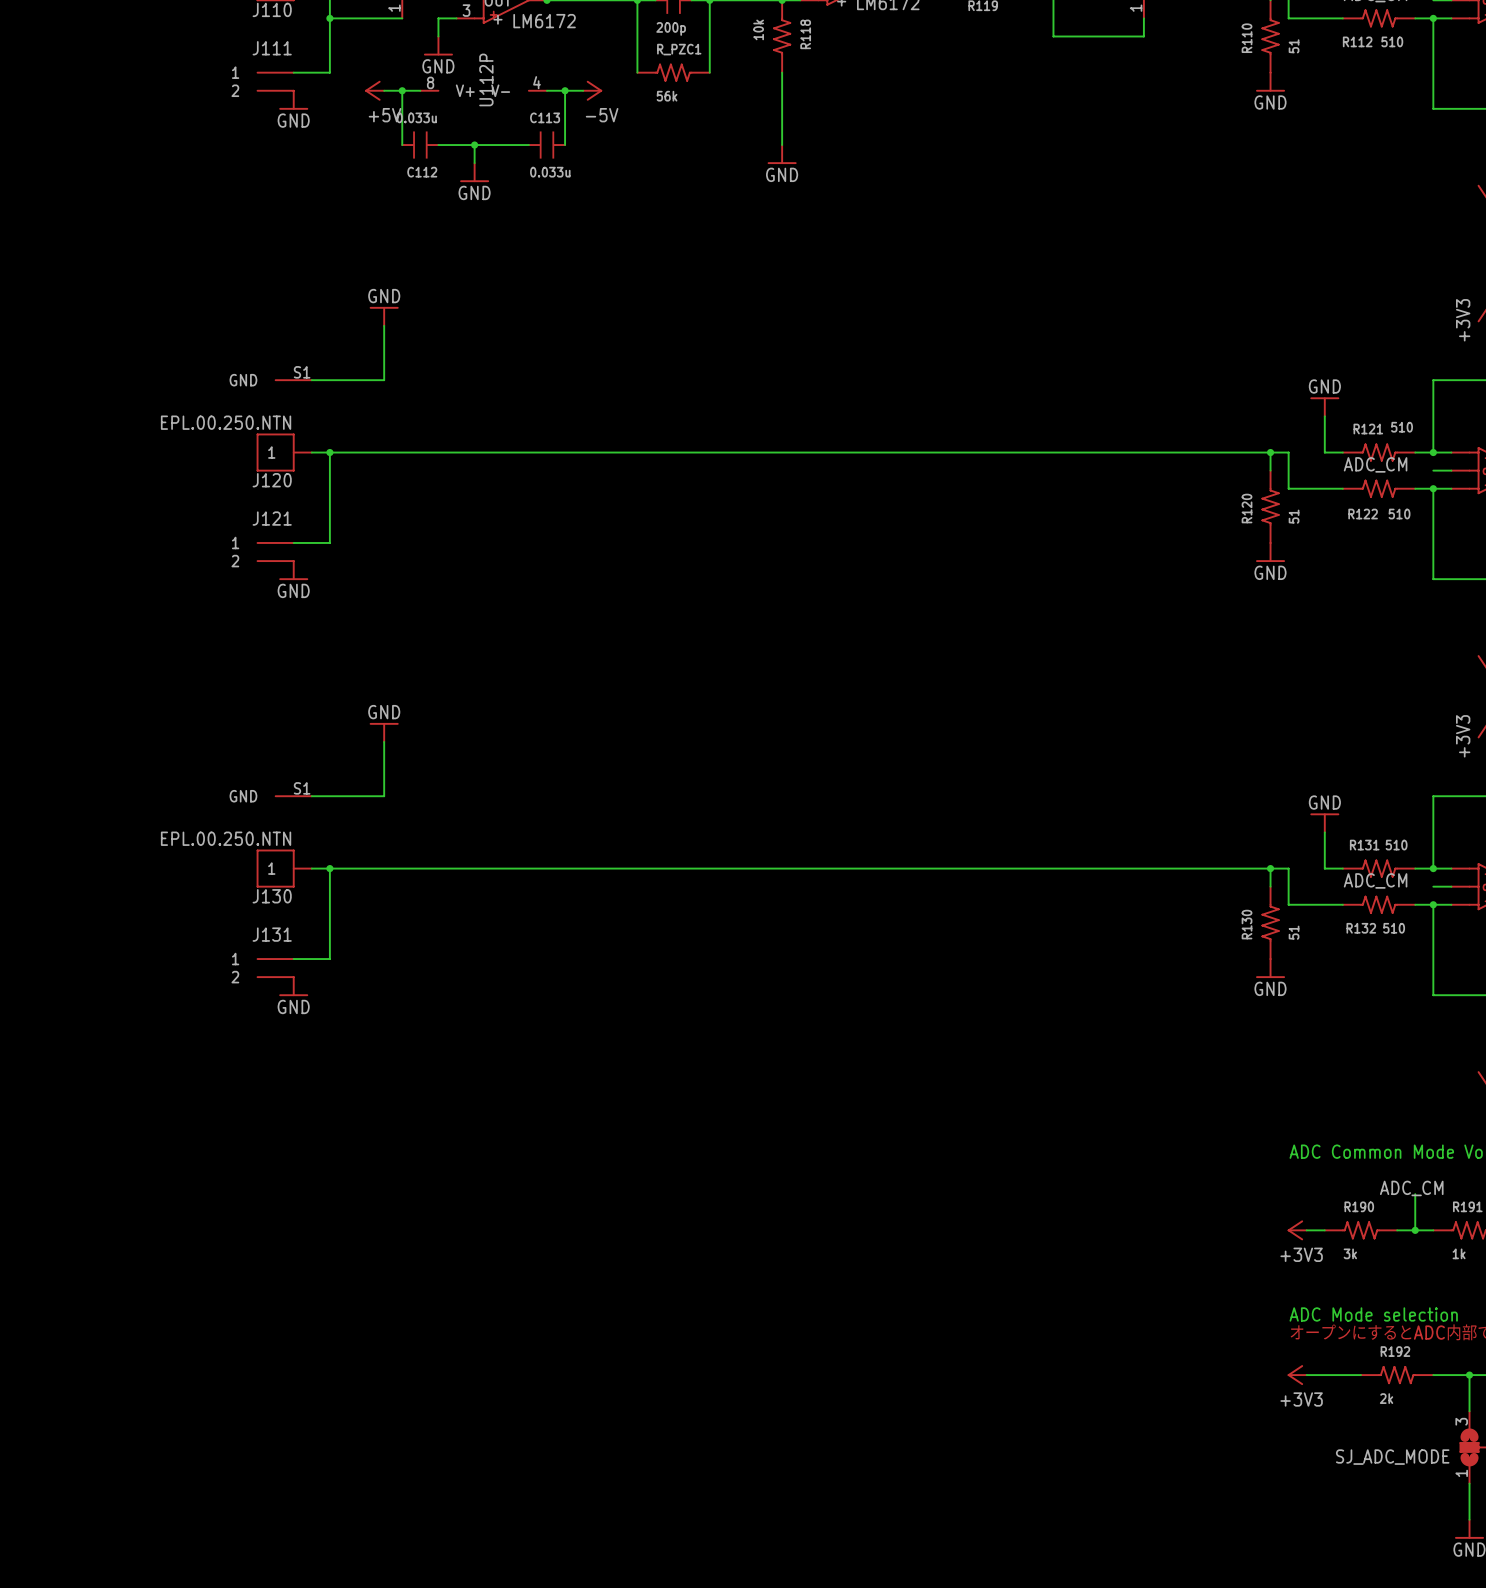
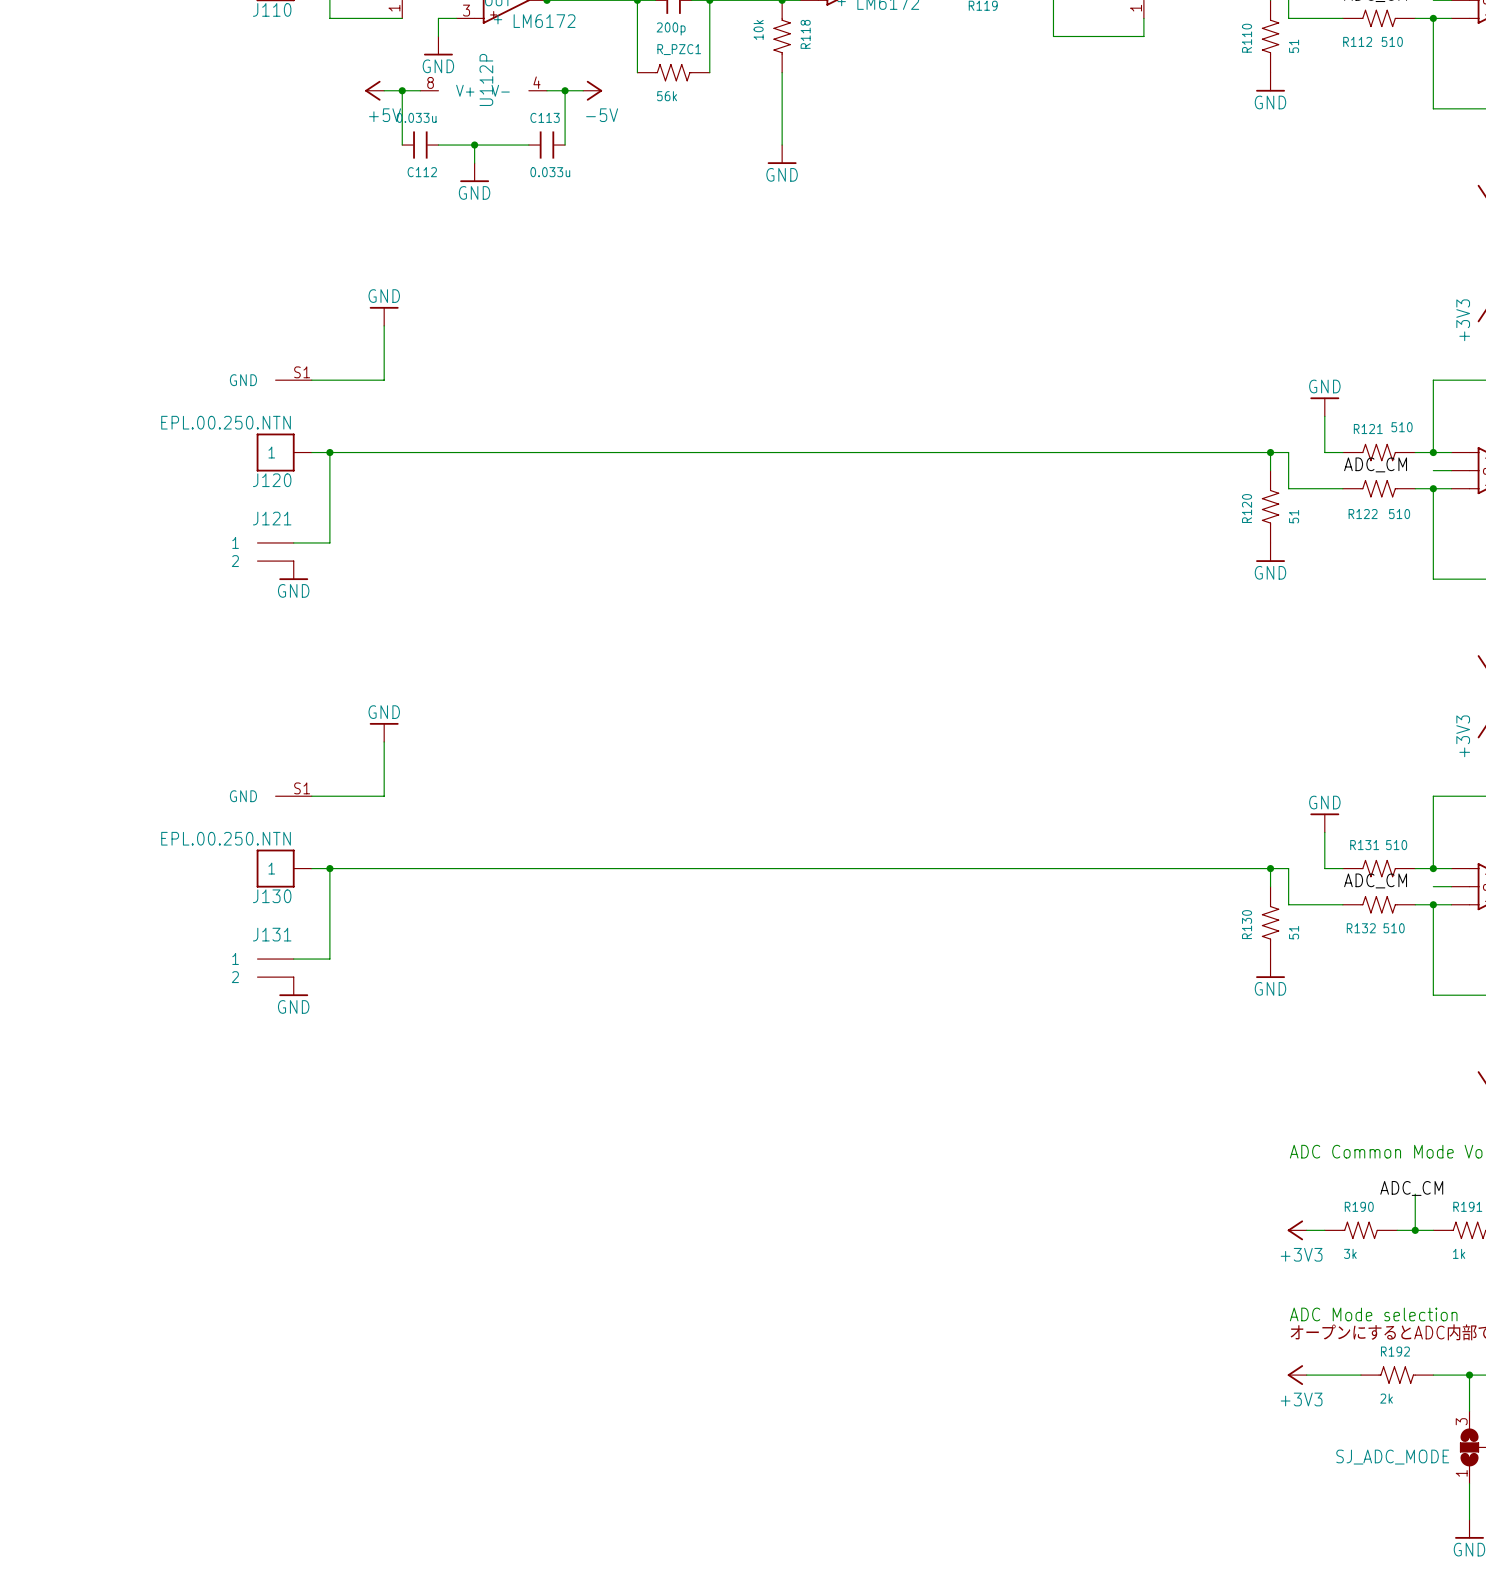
wire: (329, 18) (329, 72) (293, 72) -> none
junction: (329, 18) -> none
J111: (275, 81) -> none
power symbol: GND (293, 100) -> none

